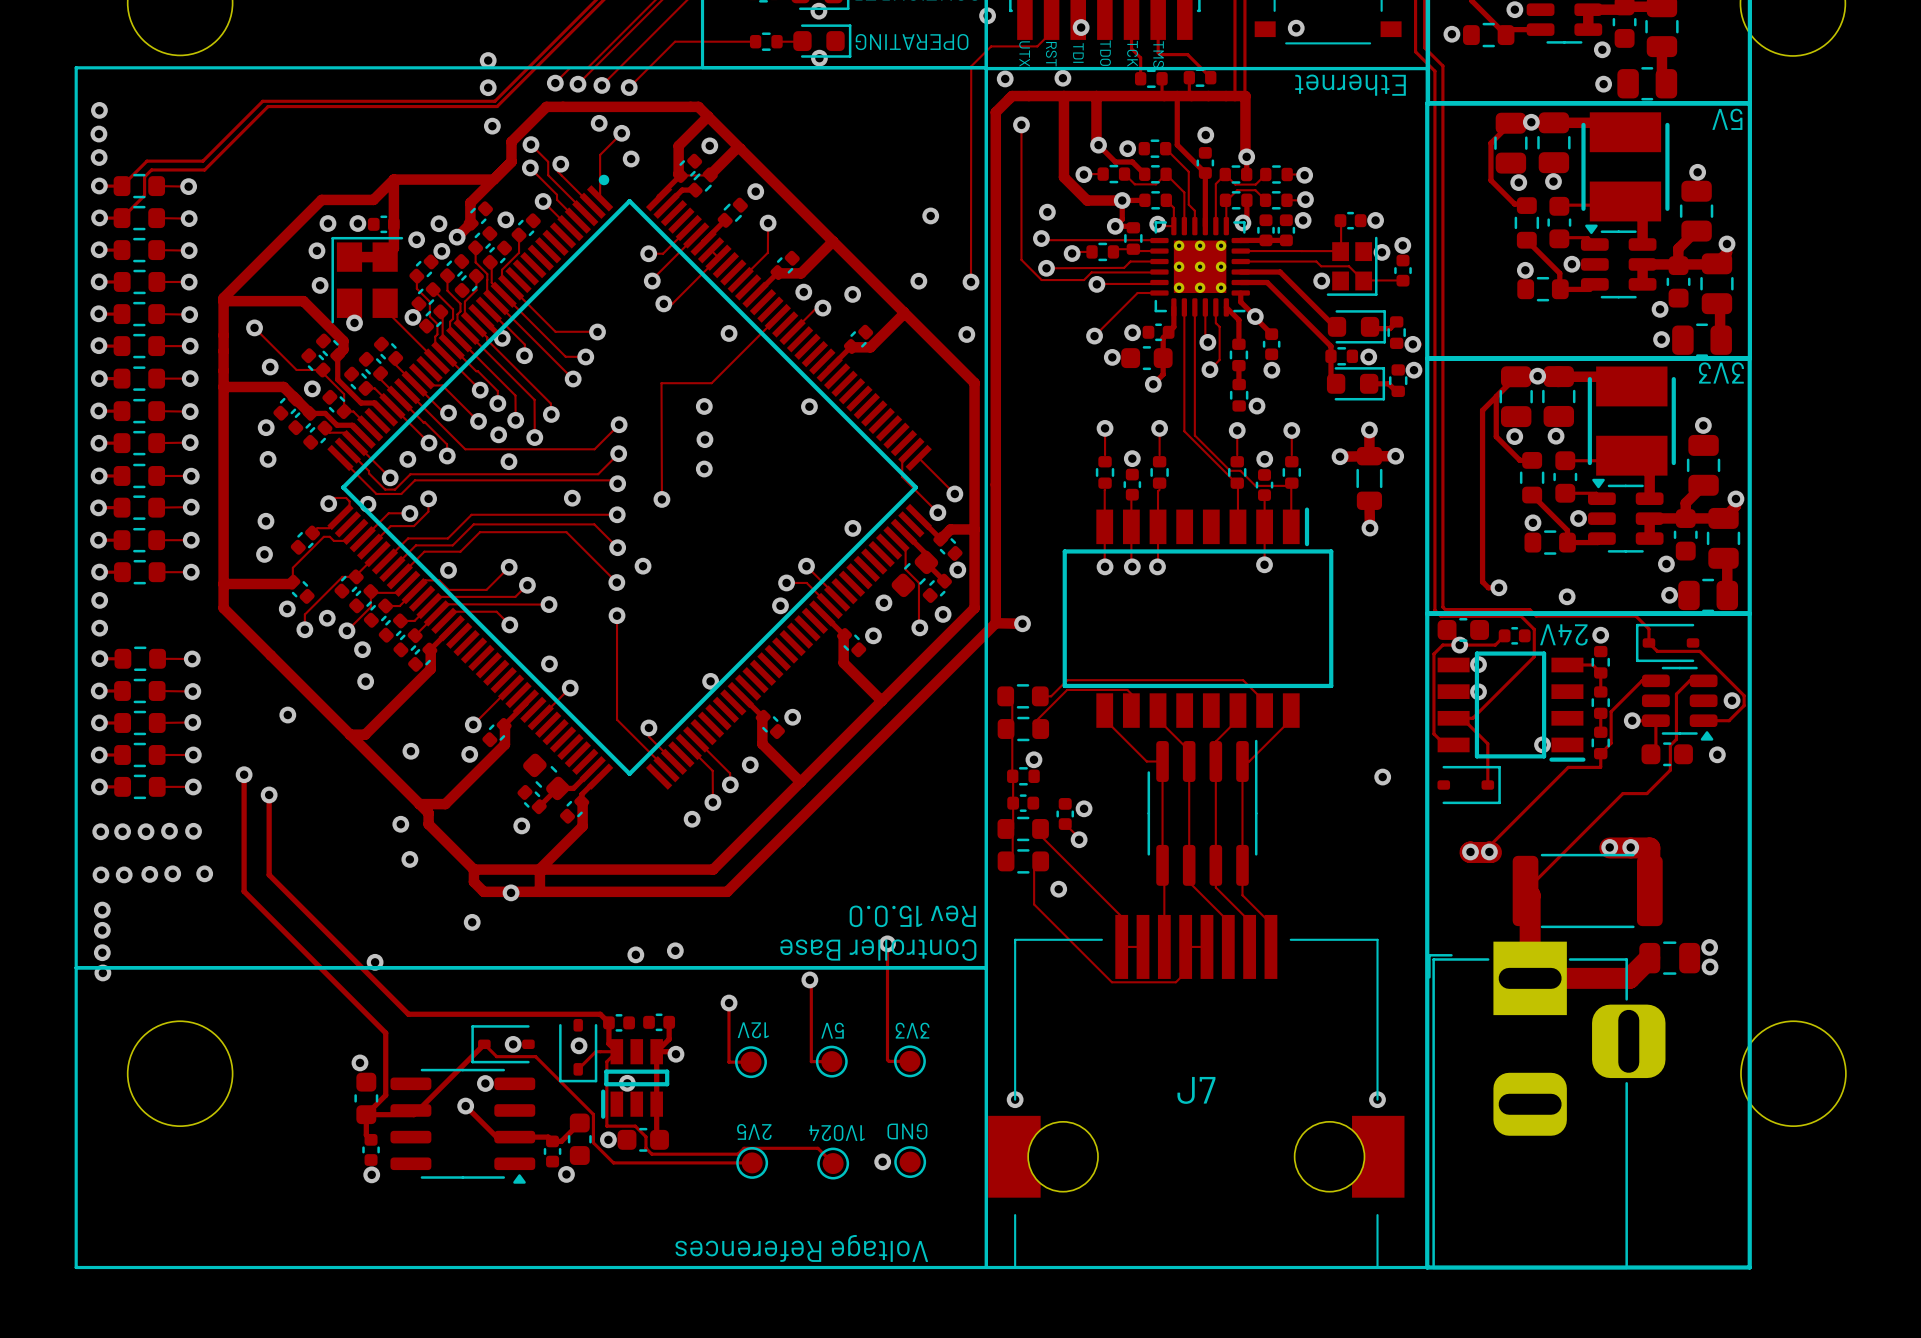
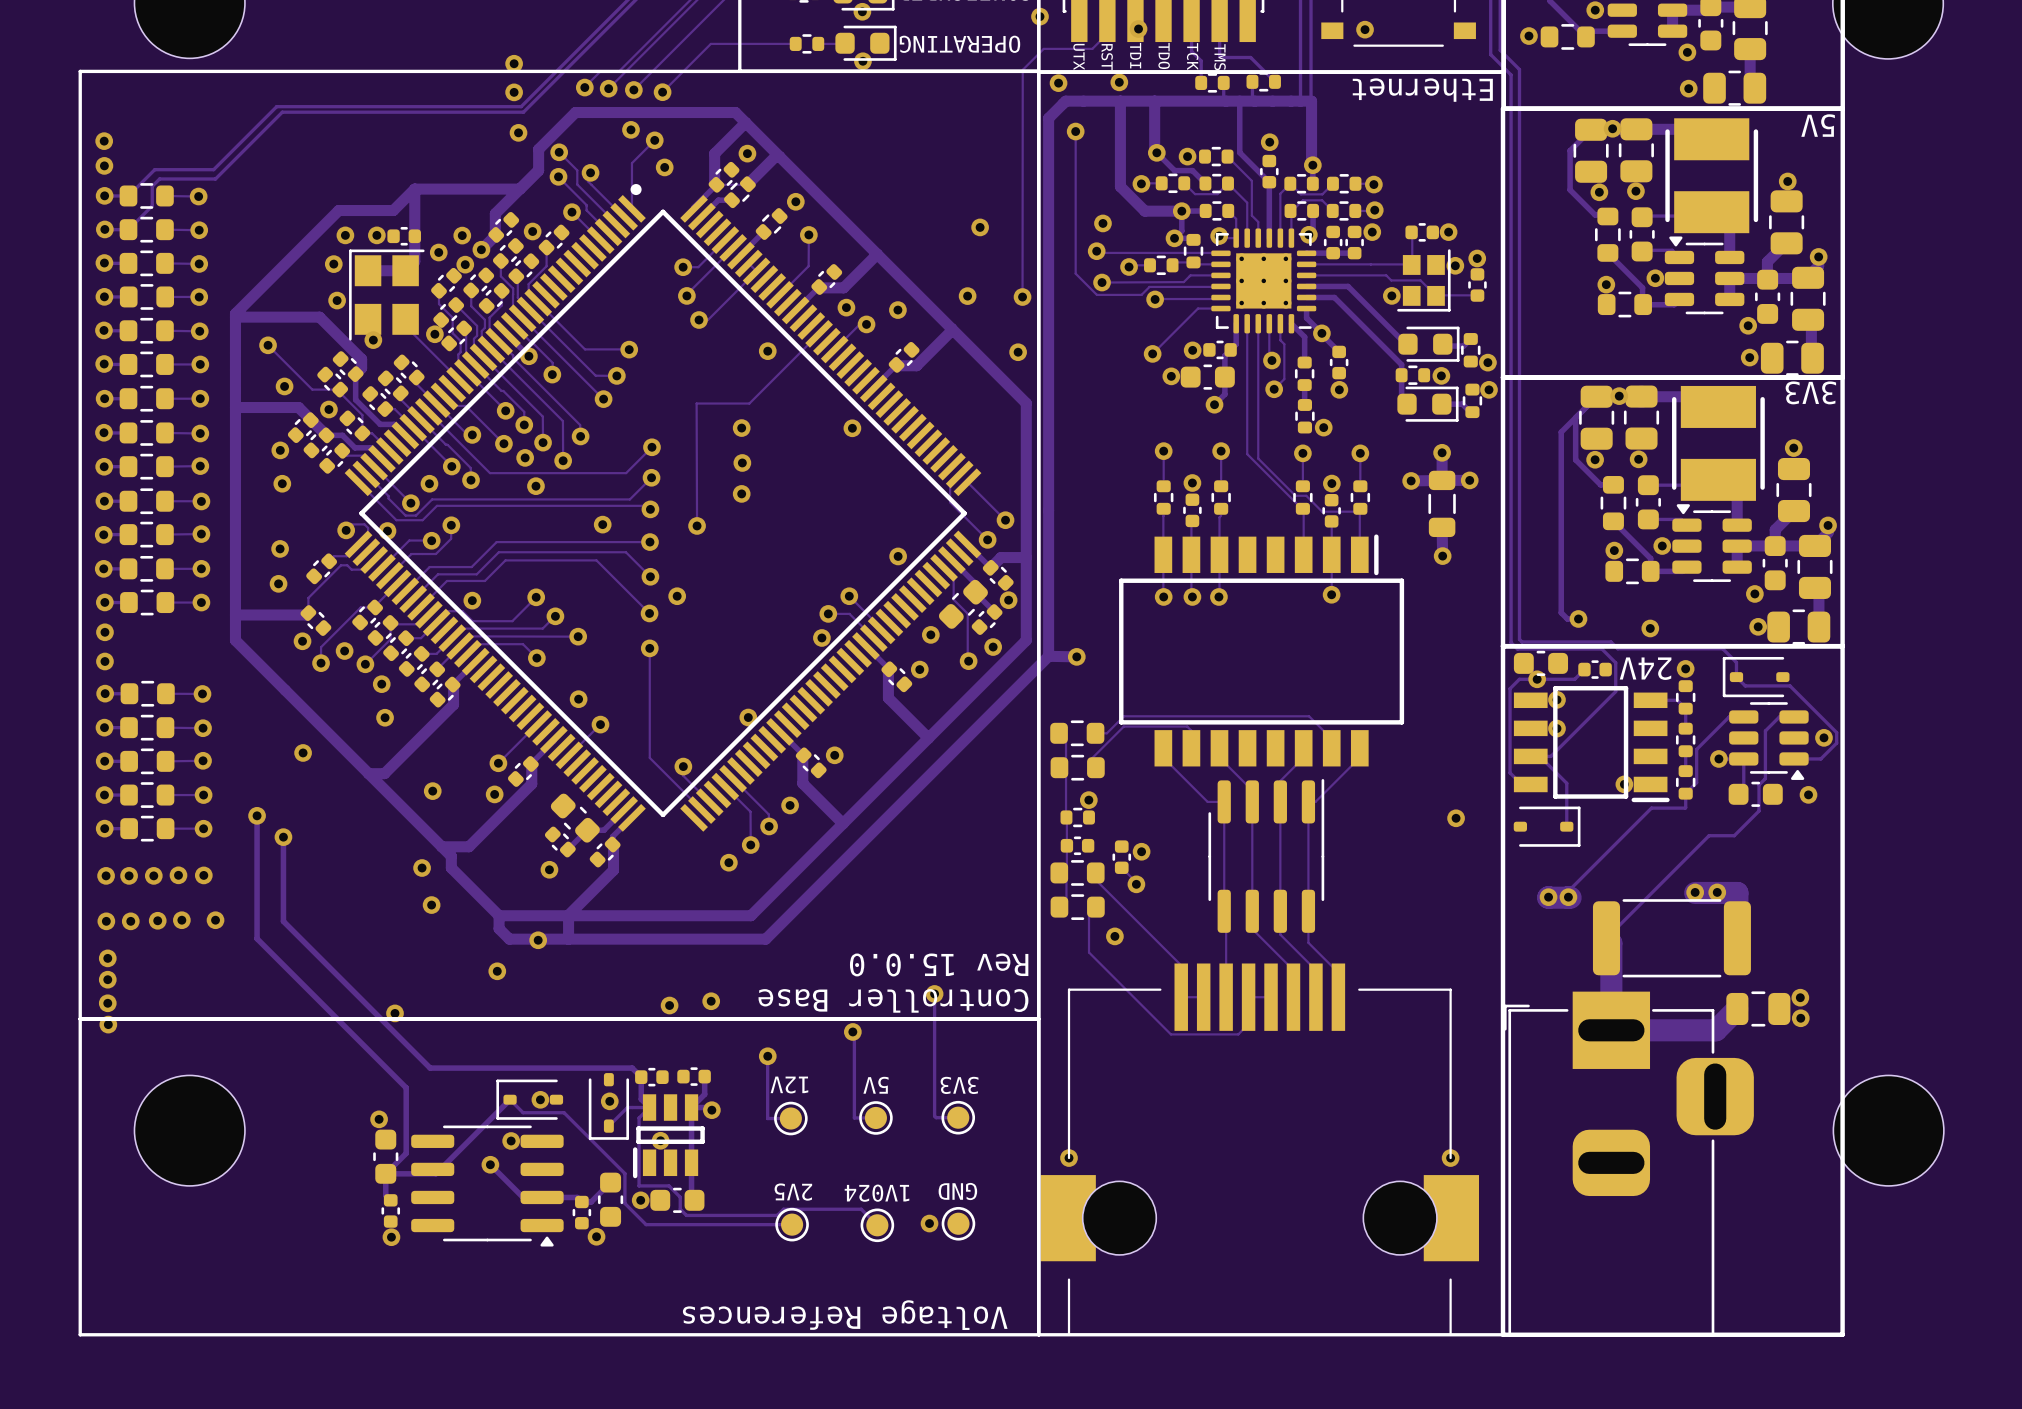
via: (99, 110) -> none
J7 name: J7 (1196, 1090) -> none

